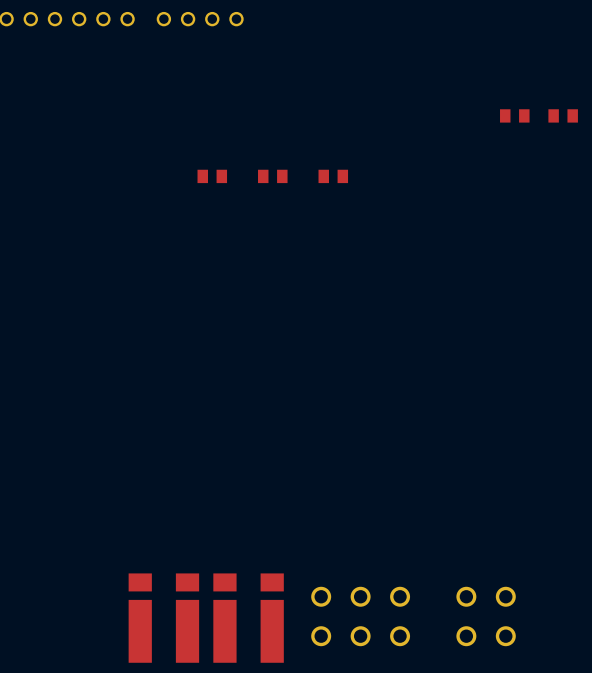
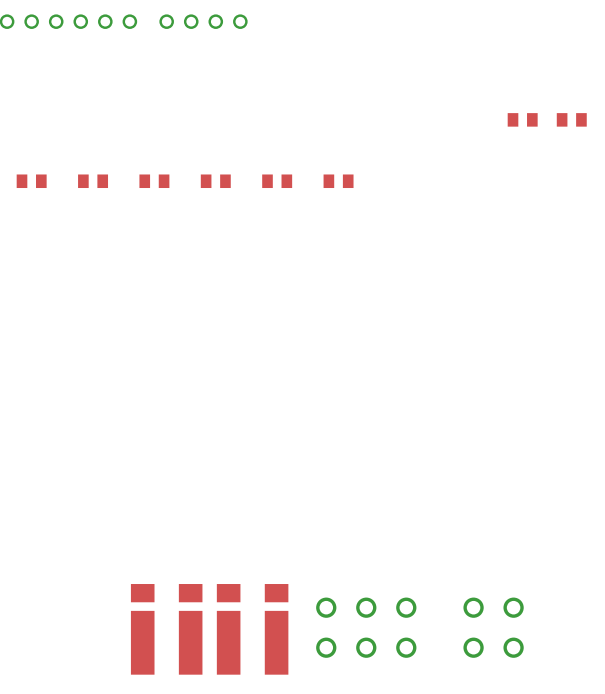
part: none -> (31, 181)
part: none -> (93, 181)
part: none -> (154, 181)

